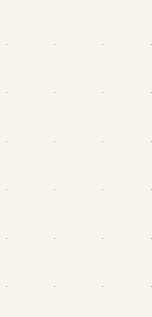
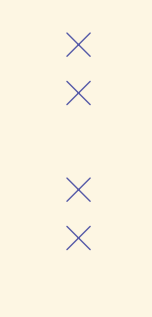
no-connect mark: none -> (78, 44)
no-connect mark: none -> (78, 92)
no-connect mark: none -> (78, 189)
no-connect mark: none -> (78, 238)

